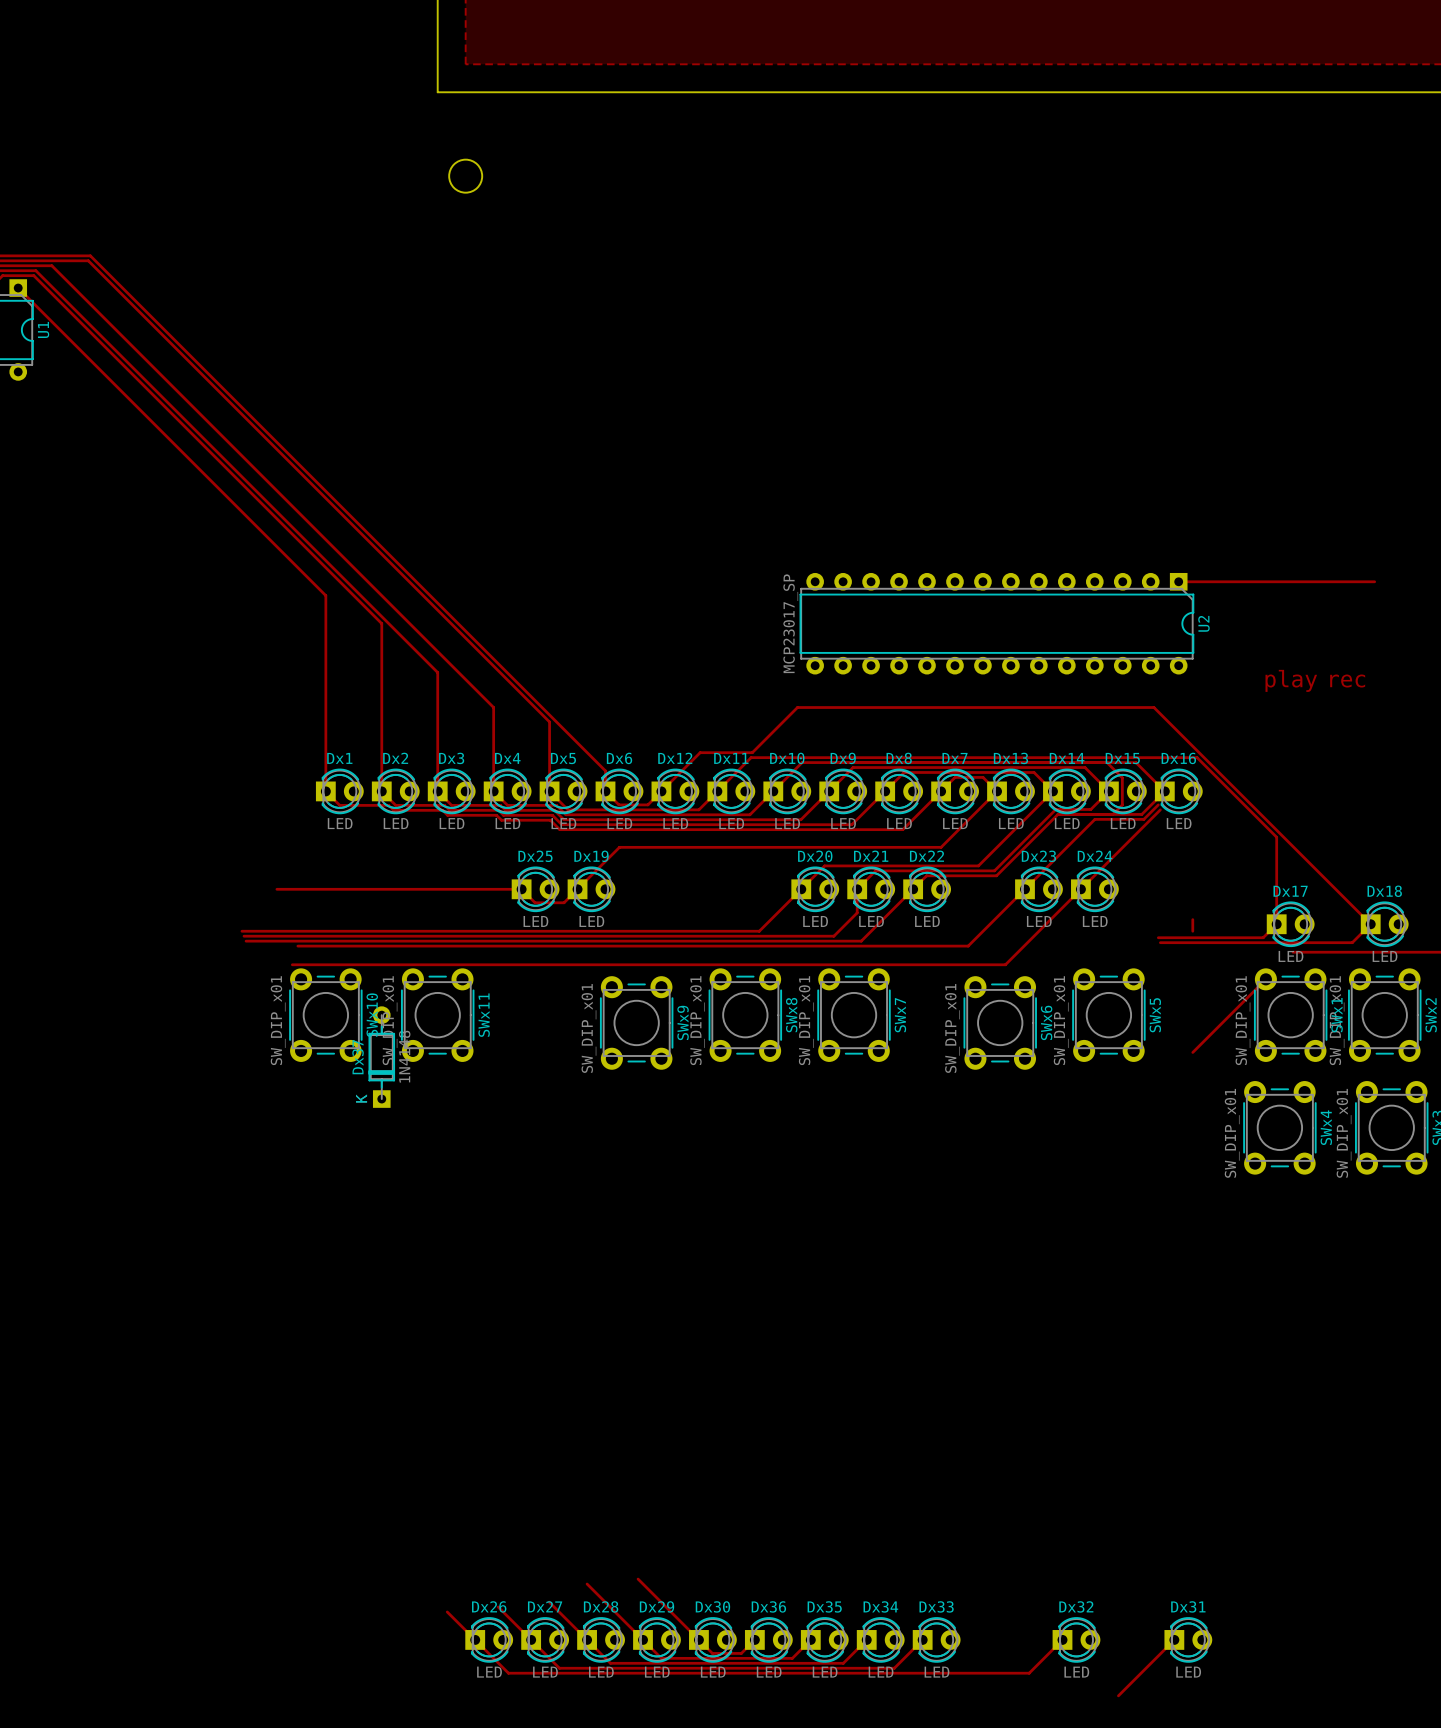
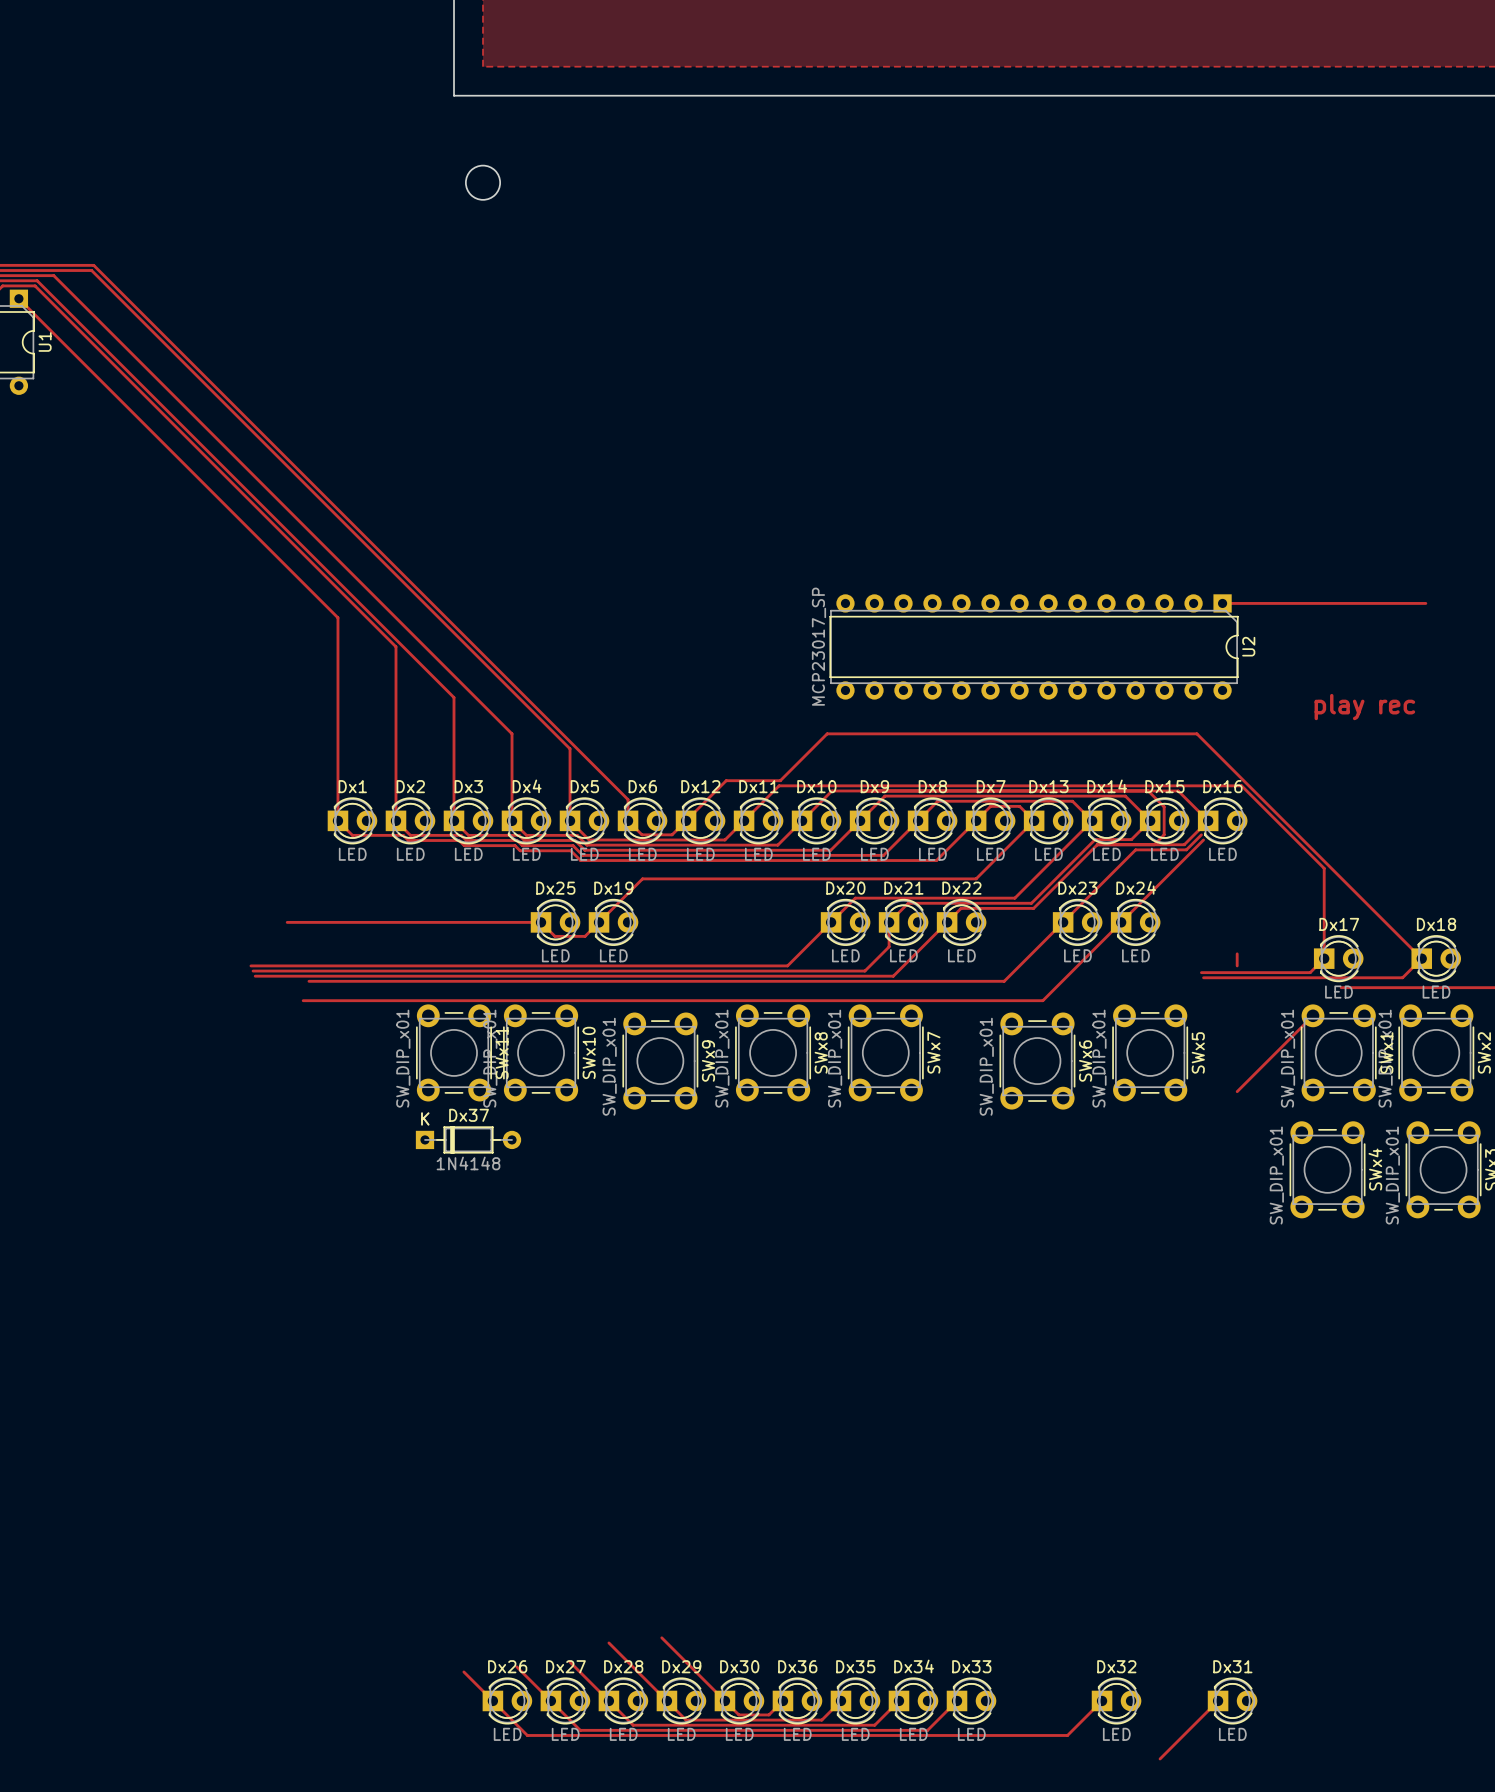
SWx10 position: (325, 1015) -> (541, 1052)
Dx37 rotation: 0° (381, 1057) -> 90° clockwise (468, 1139)
Dx37 position: (381, 1057) -> (468, 1139)

